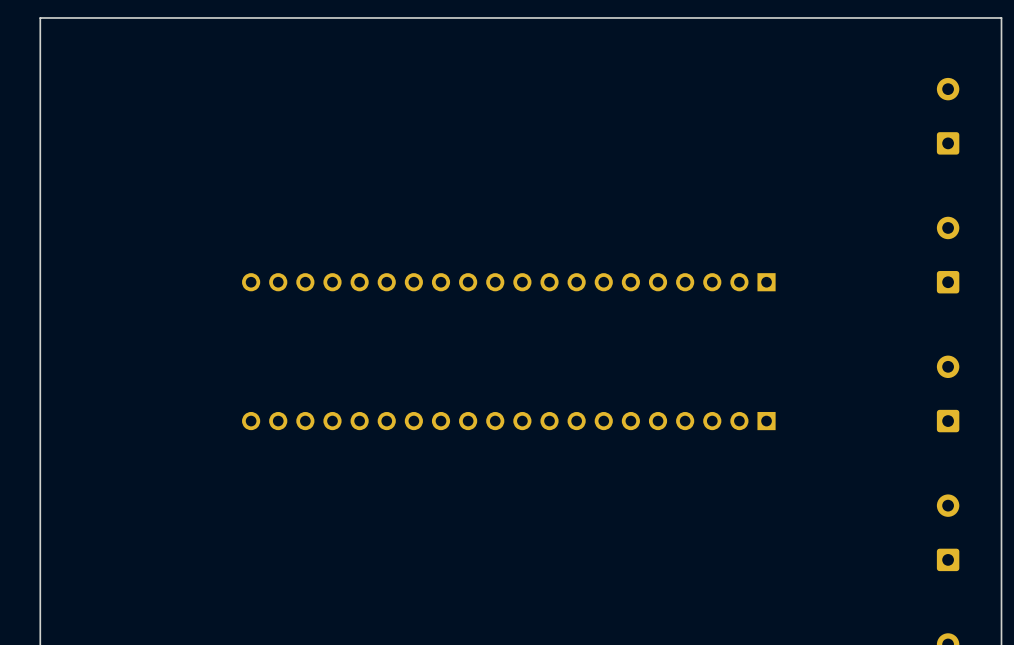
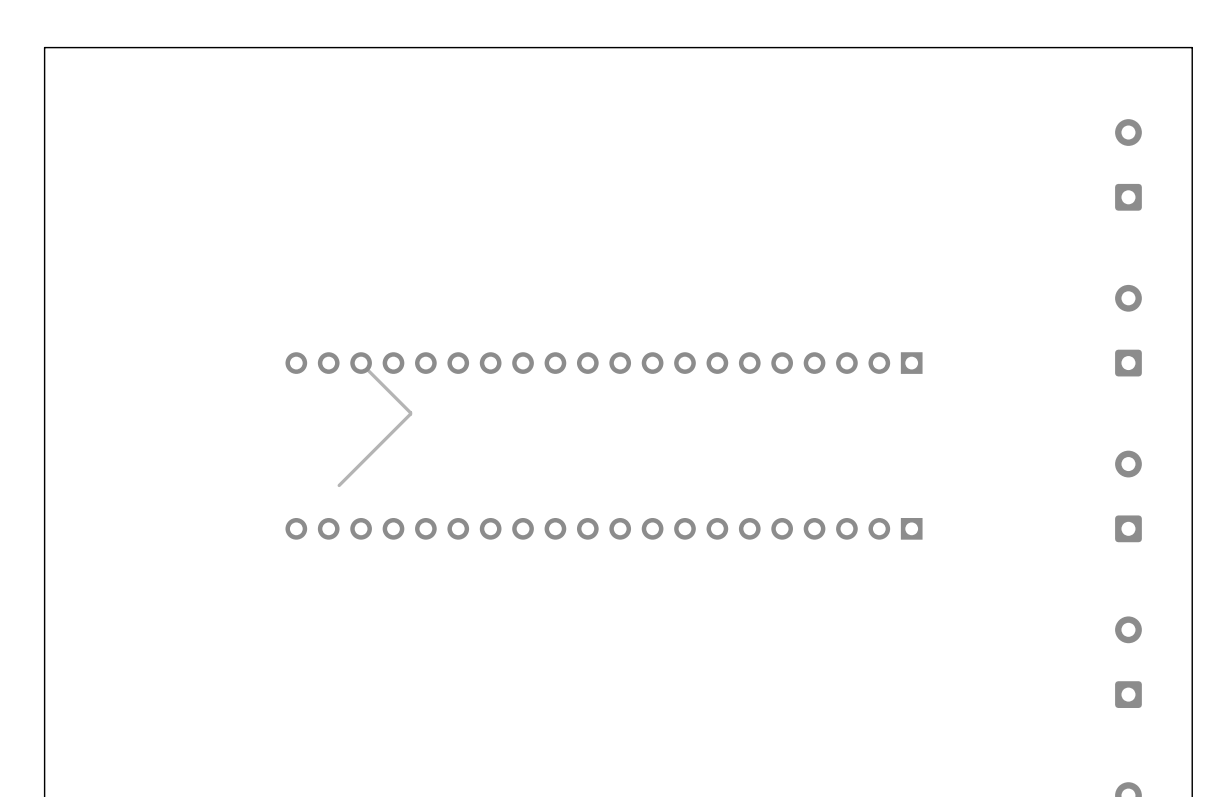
track: none -> (360, 363) (410, 414) (339, 485)

